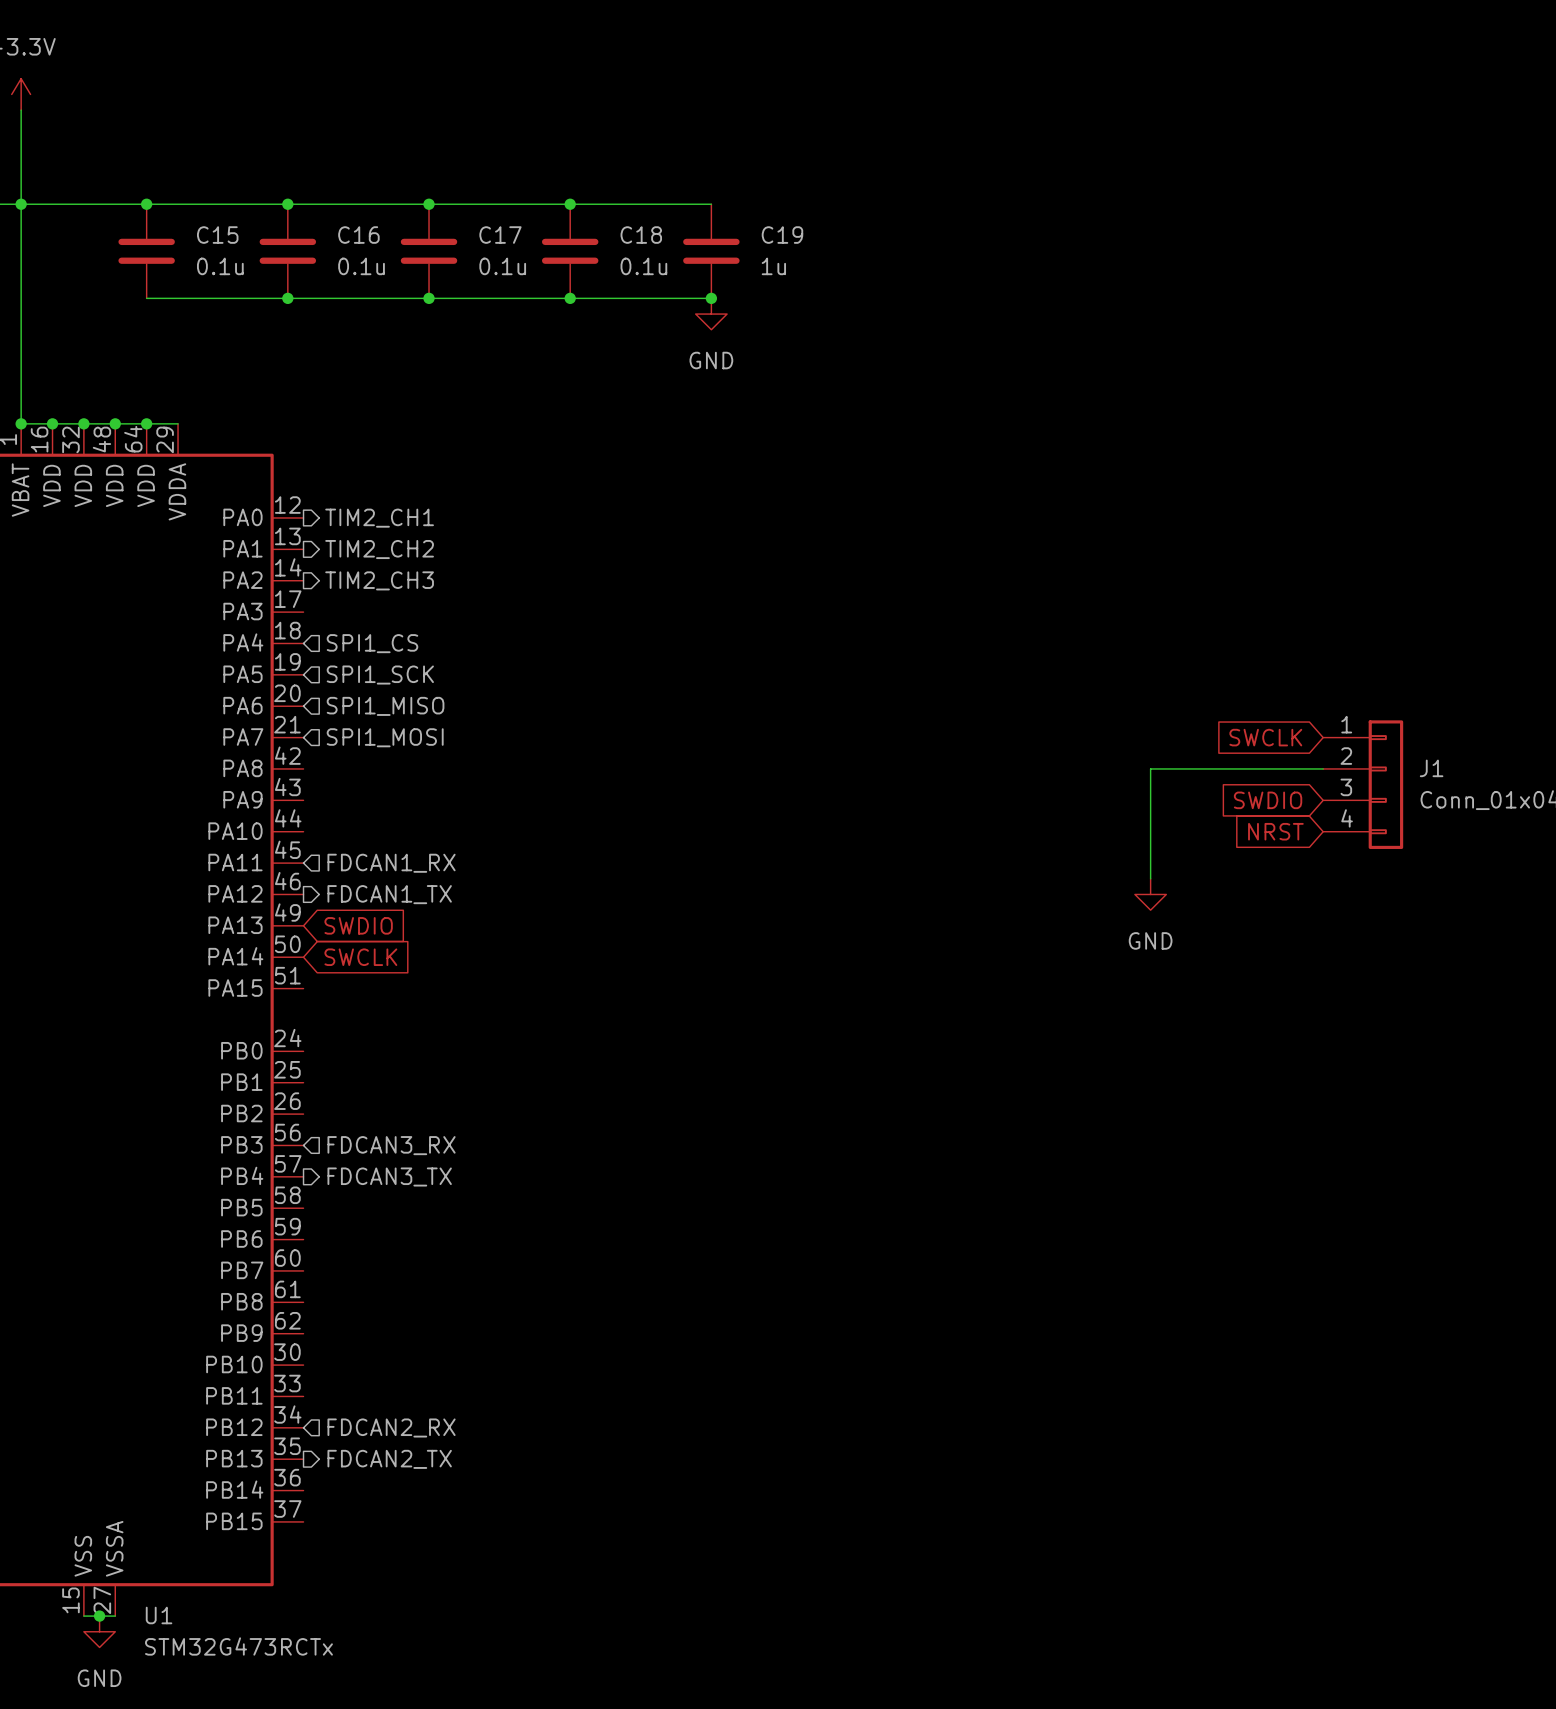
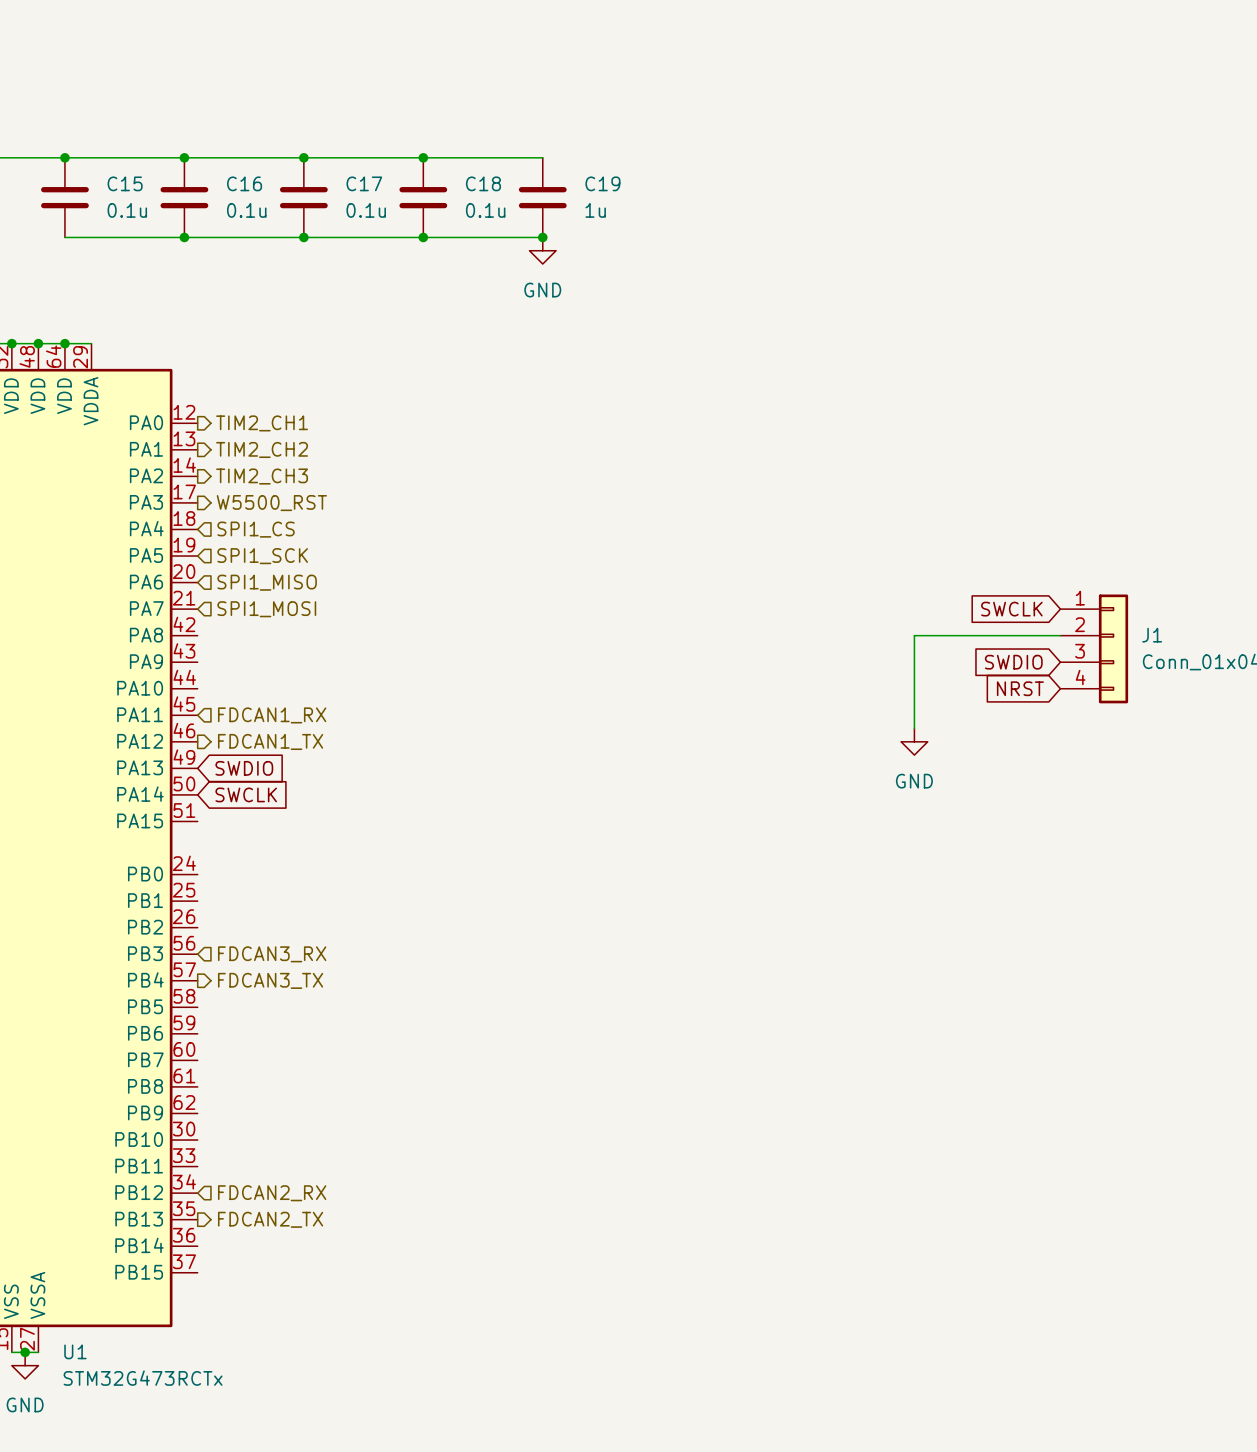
hierarchical label: none -> W5500_RST (271, 503)

